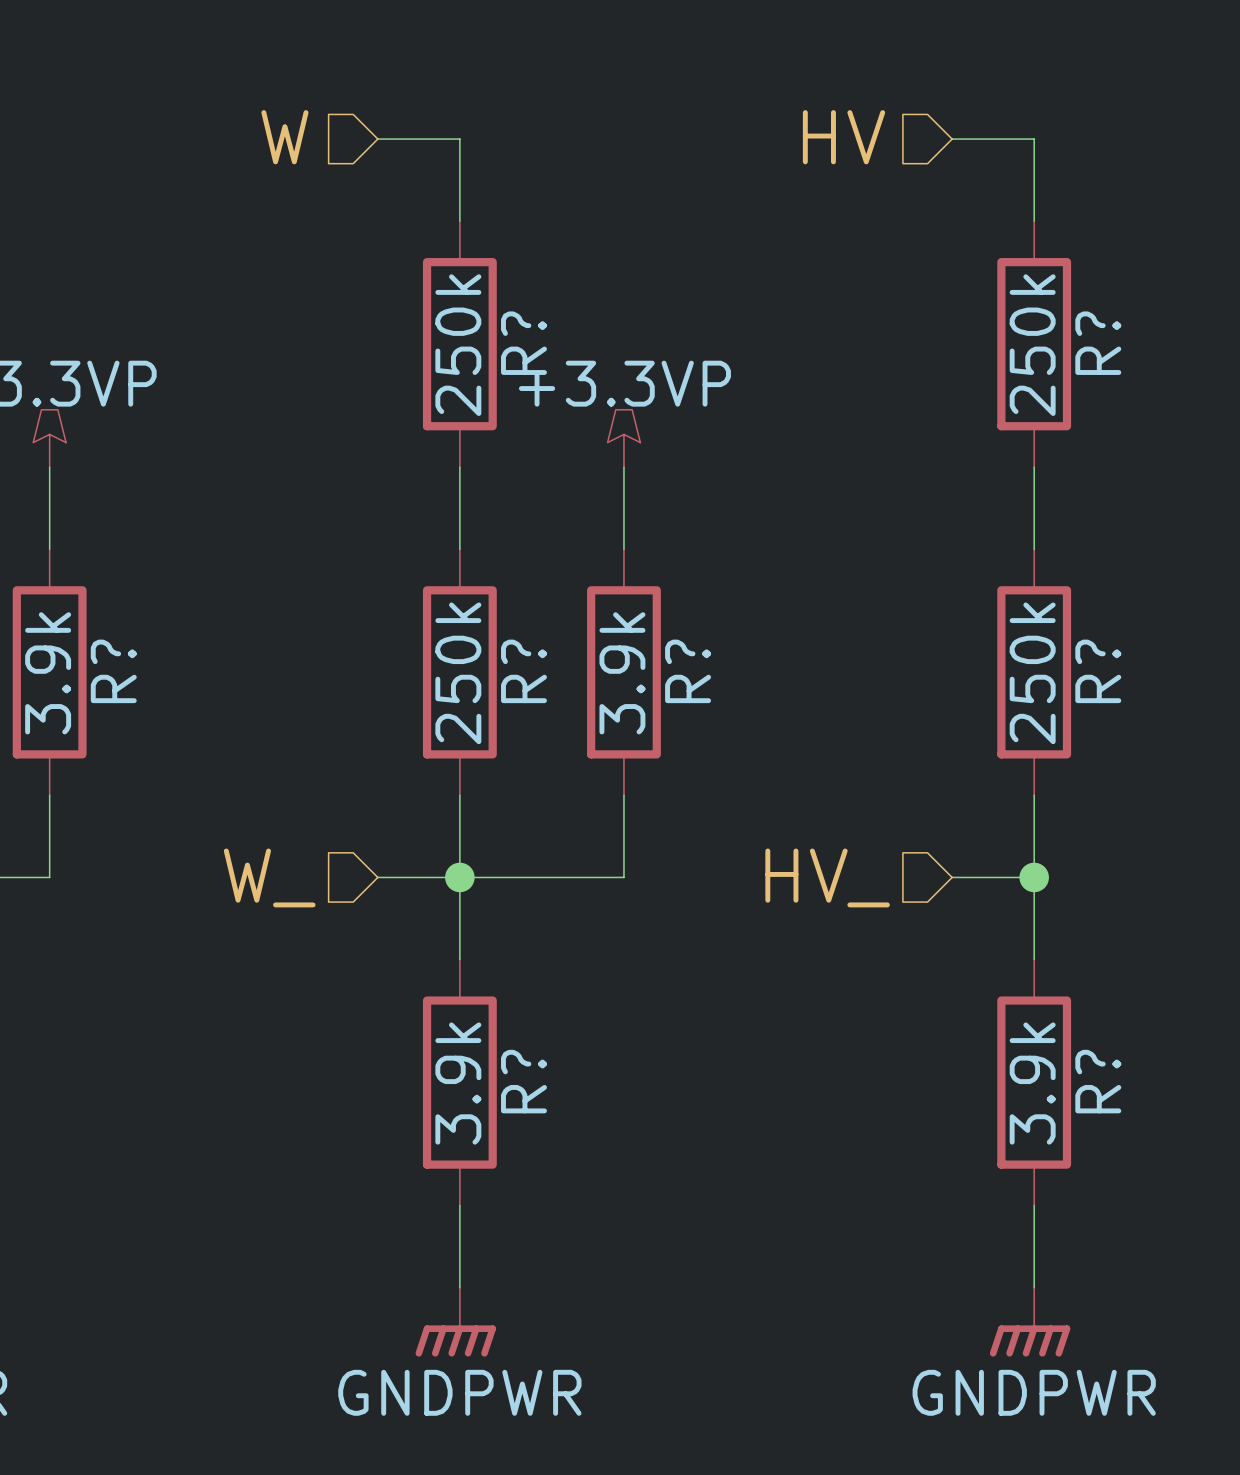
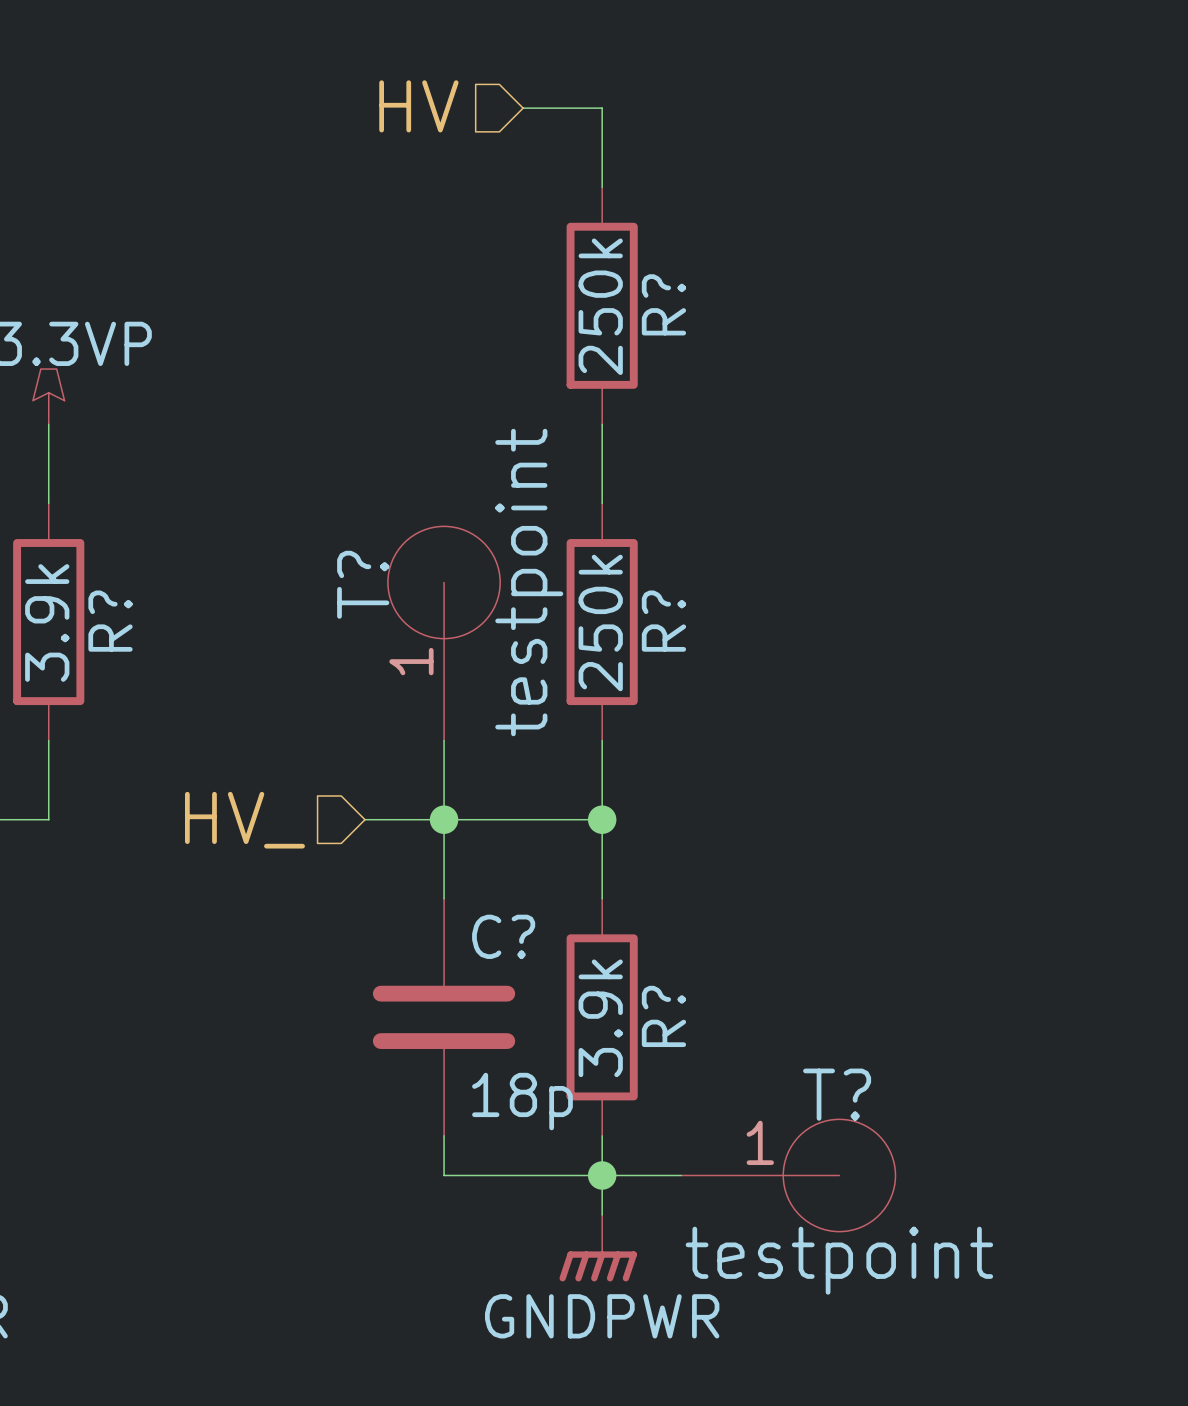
hierarchical label: W (284, 137) -> none
hierarchical label position: HV (844, 137) -> HV (418, 106)
wire: (377, 139) (459, 139) (459, 221) -> none
wire: (952, 139) (1034, 139) (1034, 221) -> (523, 108) (602, 108) (602, 187)
R? position: (459, 344) -> (602, 305)
R?: 250k (1034, 344) -> none
power symbol: +3.3VP (623, 438) -> none
wire: (459, 467) (459, 549) -> (602, 819) (602, 898)
wire: (1034, 467) (1034, 549) -> none
R?: 250k (459, 672) -> none
R?: 250k (1034, 672) -> none
R? value: 3.9k (622, 673) -> 250k (600, 622)
T?: none -> testpoint (444, 633)
wire: (1034, 795) (1034, 959) -> none
hierarchical label: W_ (269, 877) -> HV_ (244, 820)
junction: none -> (602, 819)
hierarchical label: HV_ (827, 877) -> none
wire: (952, 877) (1034, 877) -> none
junction: (1034, 877) -> none
R? position: (459, 1082) -> (602, 1017)
C?: none -> 18p (444, 1017)
R?: 3.9k (1034, 1082) -> none
wire: (1034, 1205) (1034, 1287) -> (602, 1135) (602, 1215)
wire: (459, 1246) (459, 1287) -> (444, 1175) (681, 1175)
junction: none -> (602, 1175)
T?: none -> testpoint (788, 1175)
power symbol position: GNDPWR (455, 1322) -> GNDPWR (598, 1248)
power symbol: GNDPWR (1030, 1322) -> none

